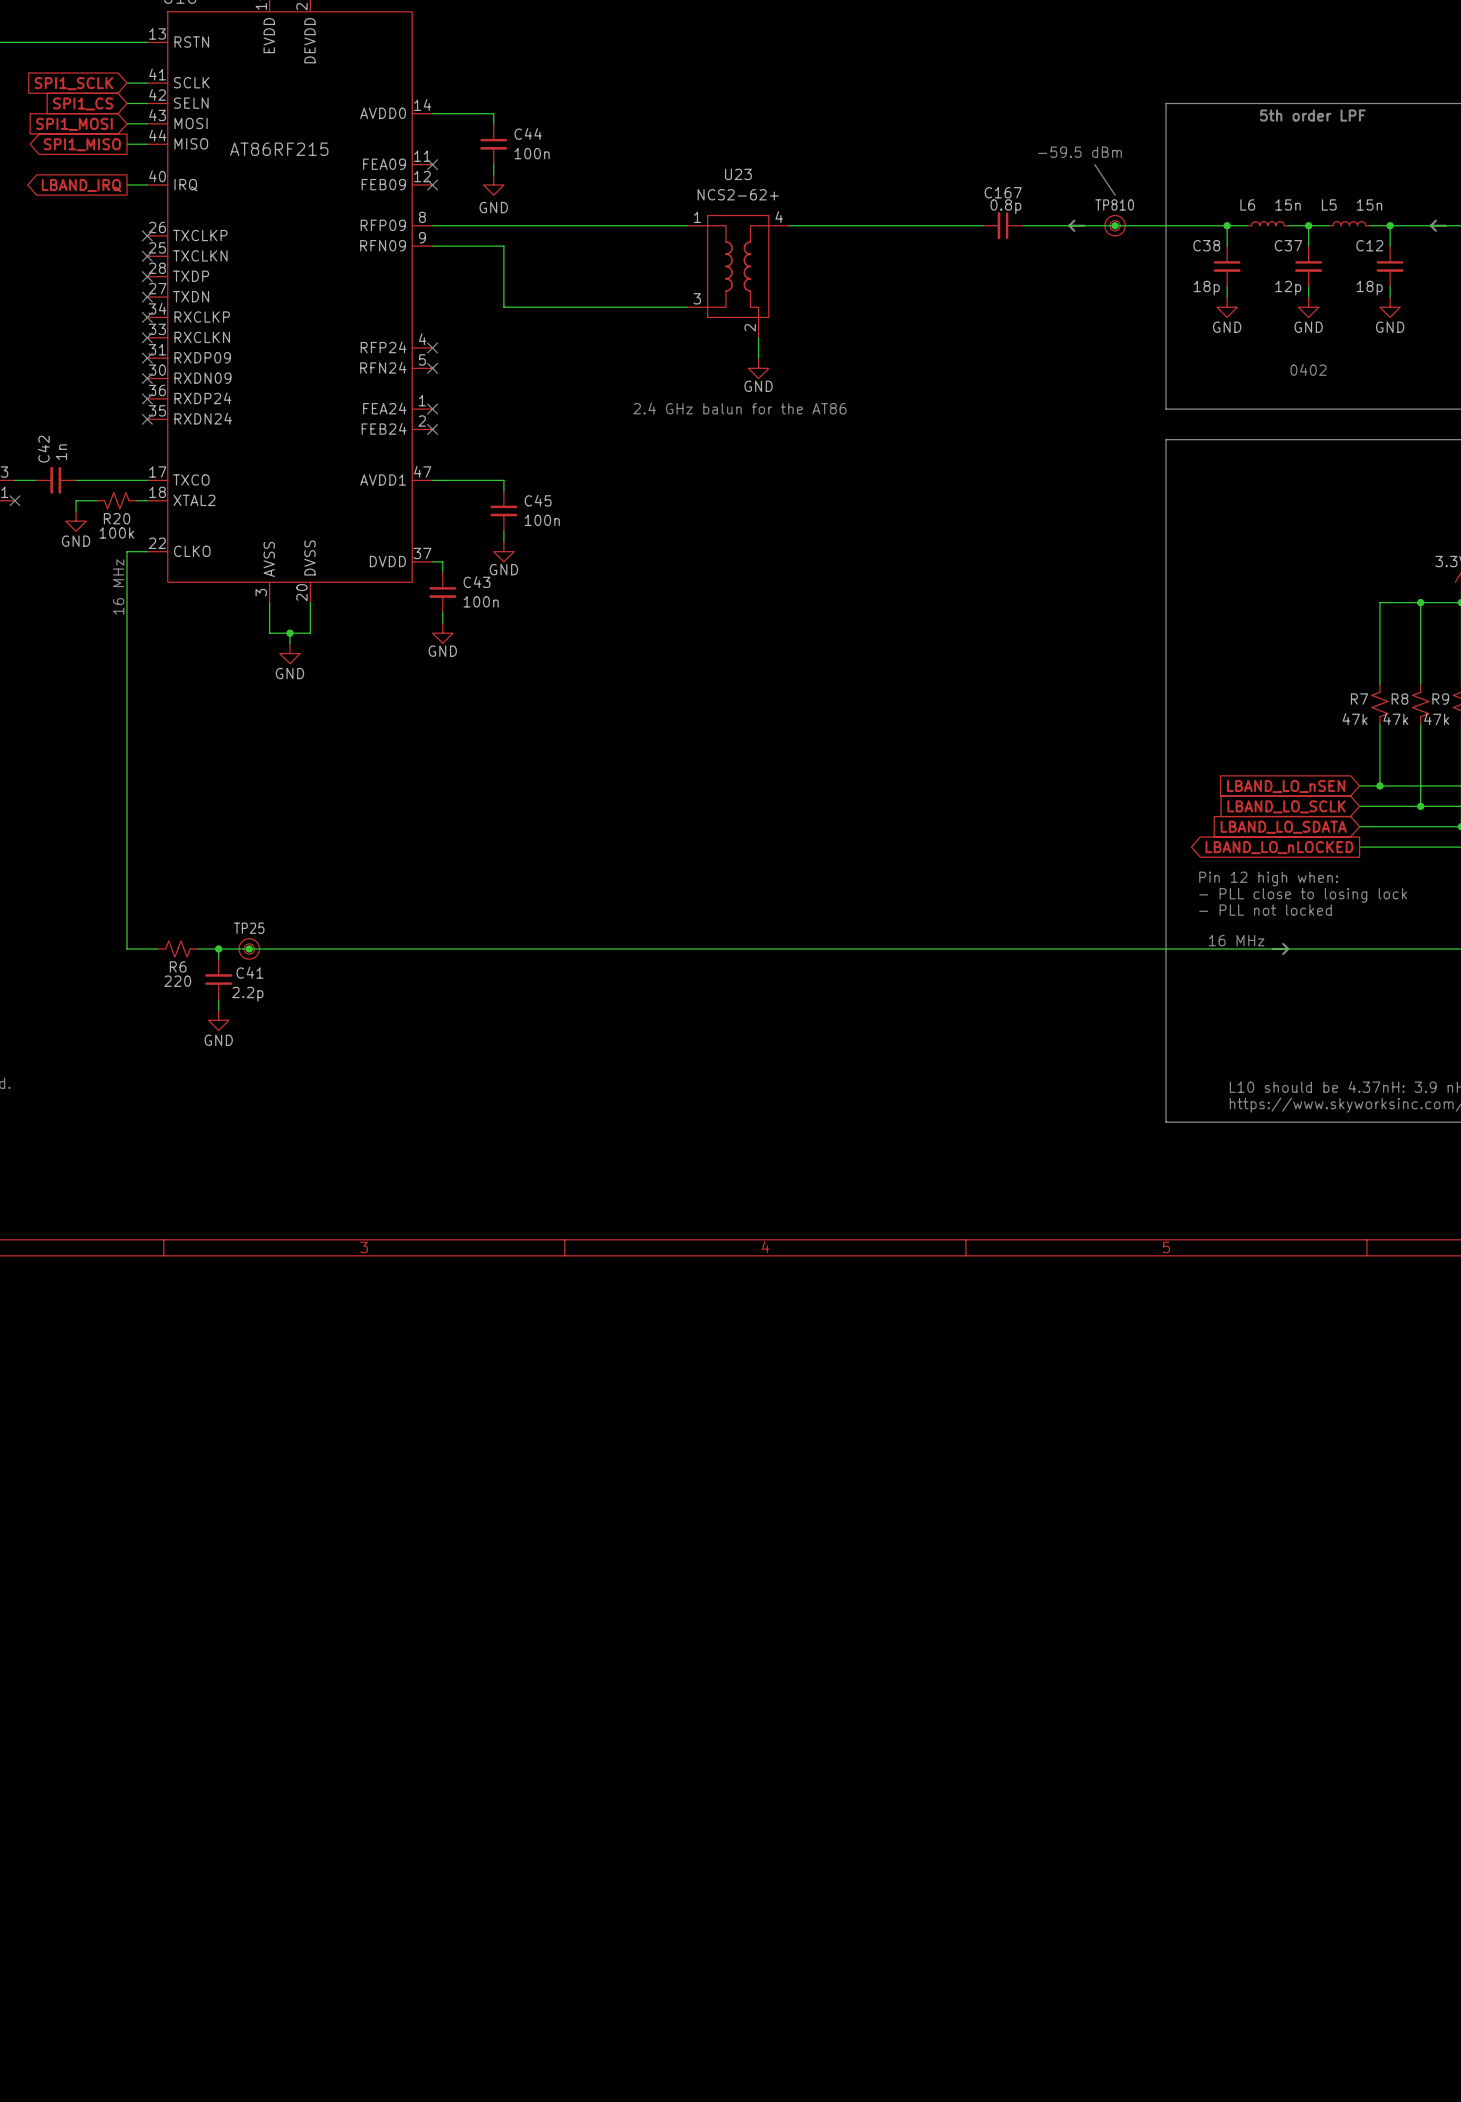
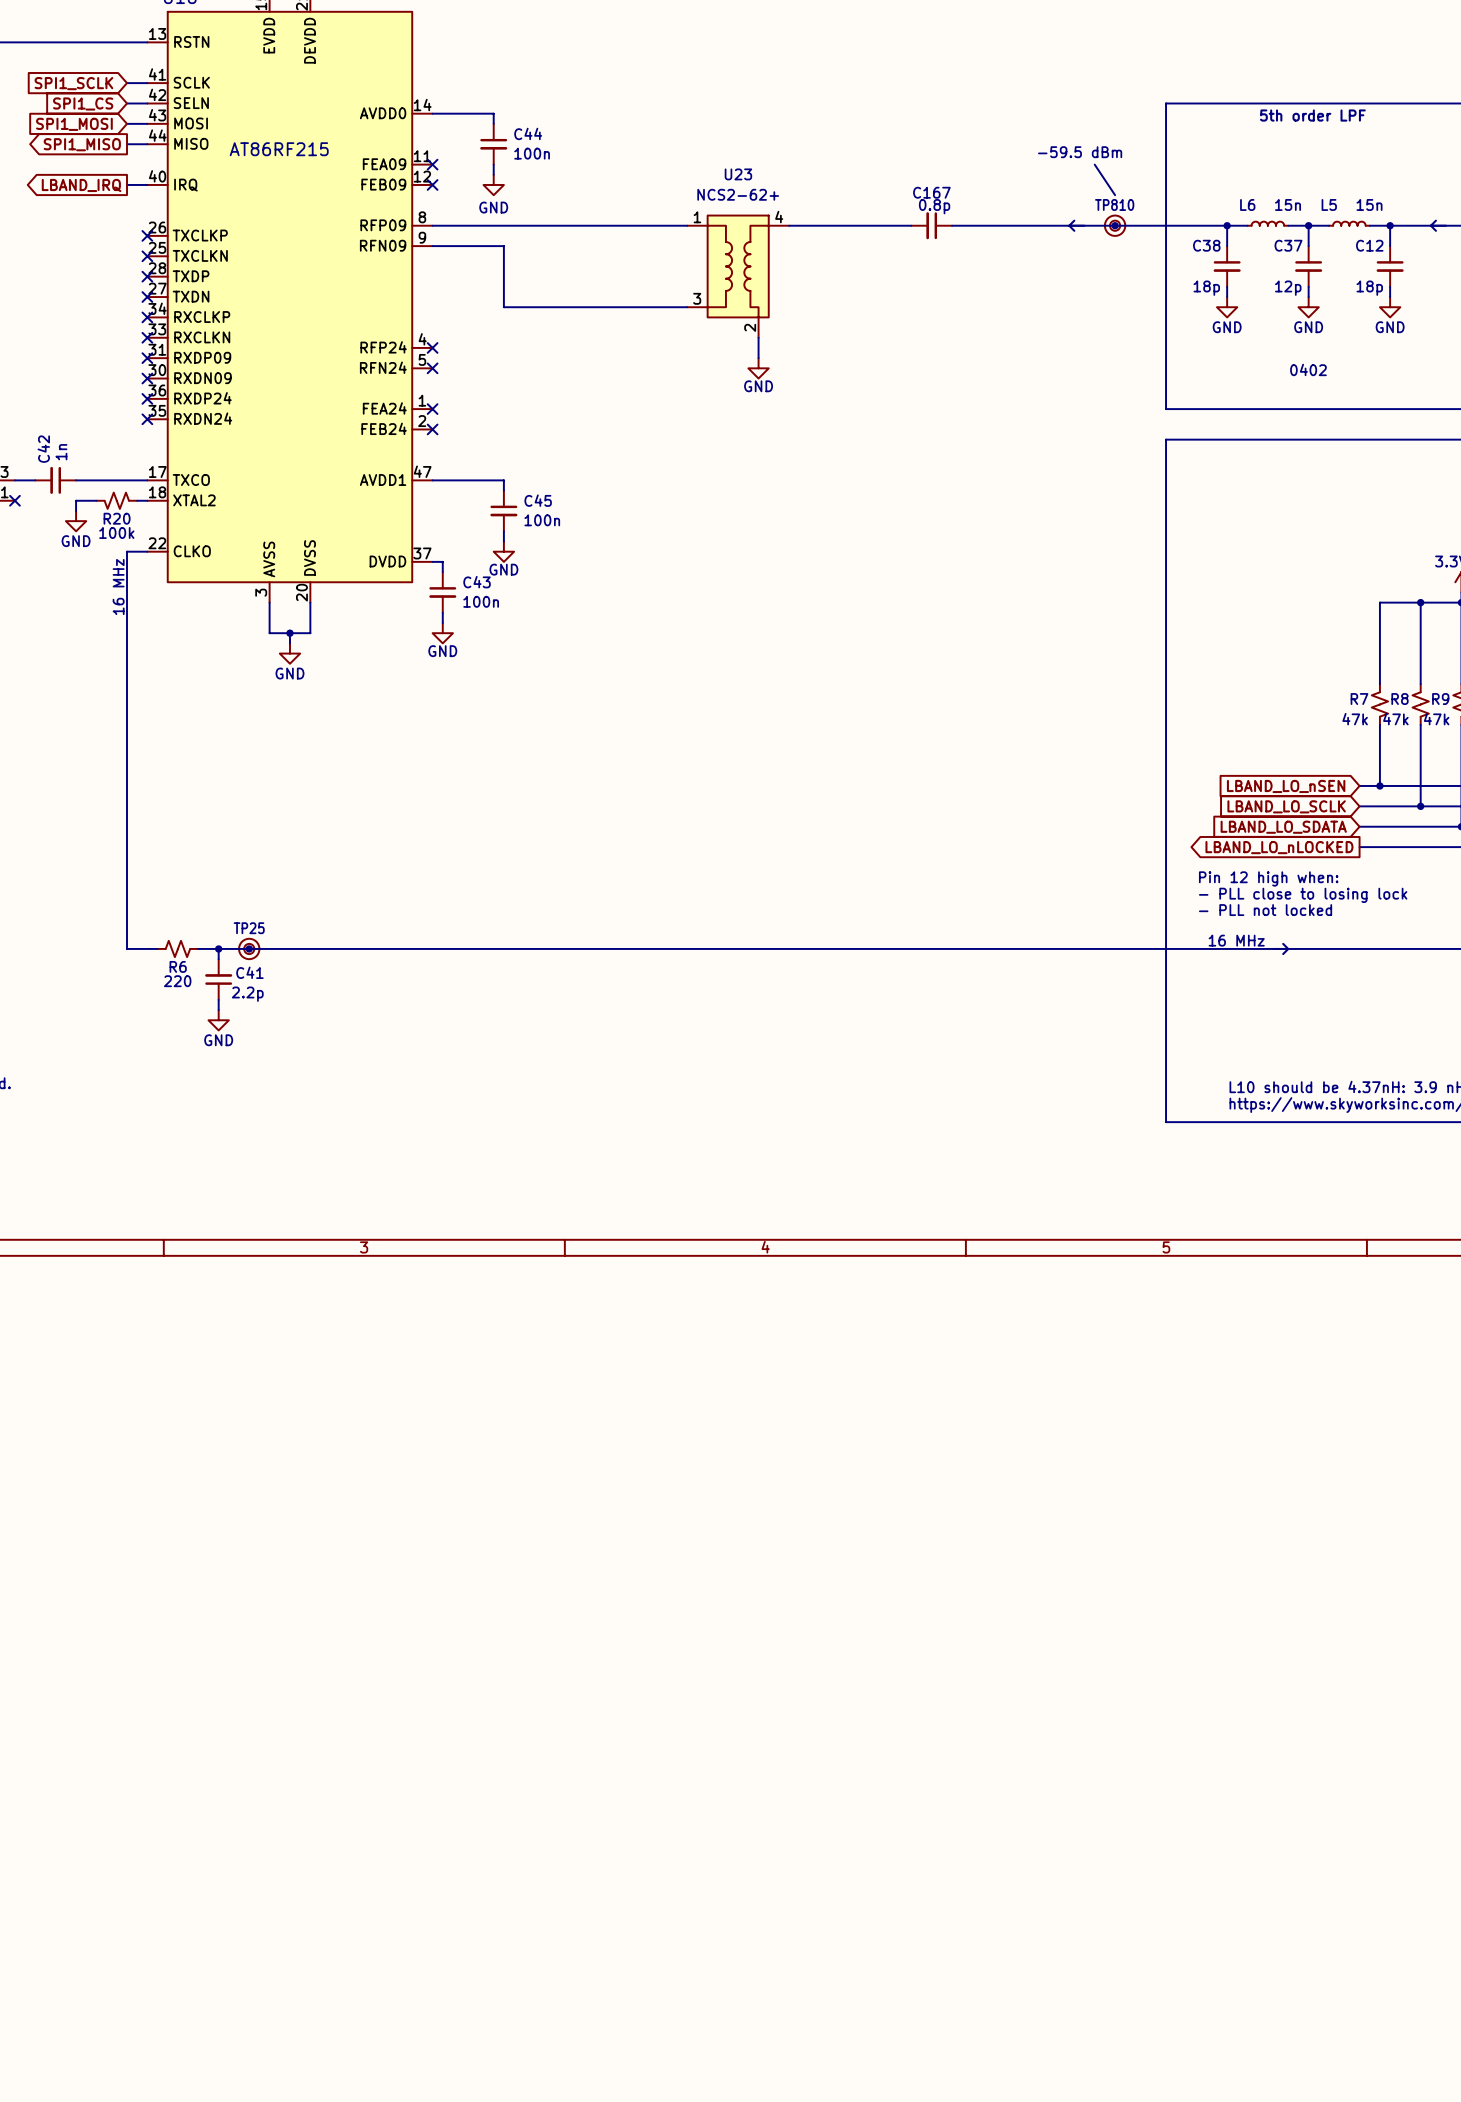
C167 position: (1003, 225) -> (931, 225)
text: 2.4 GHz balun for the AT86 (739, 408) -> none

